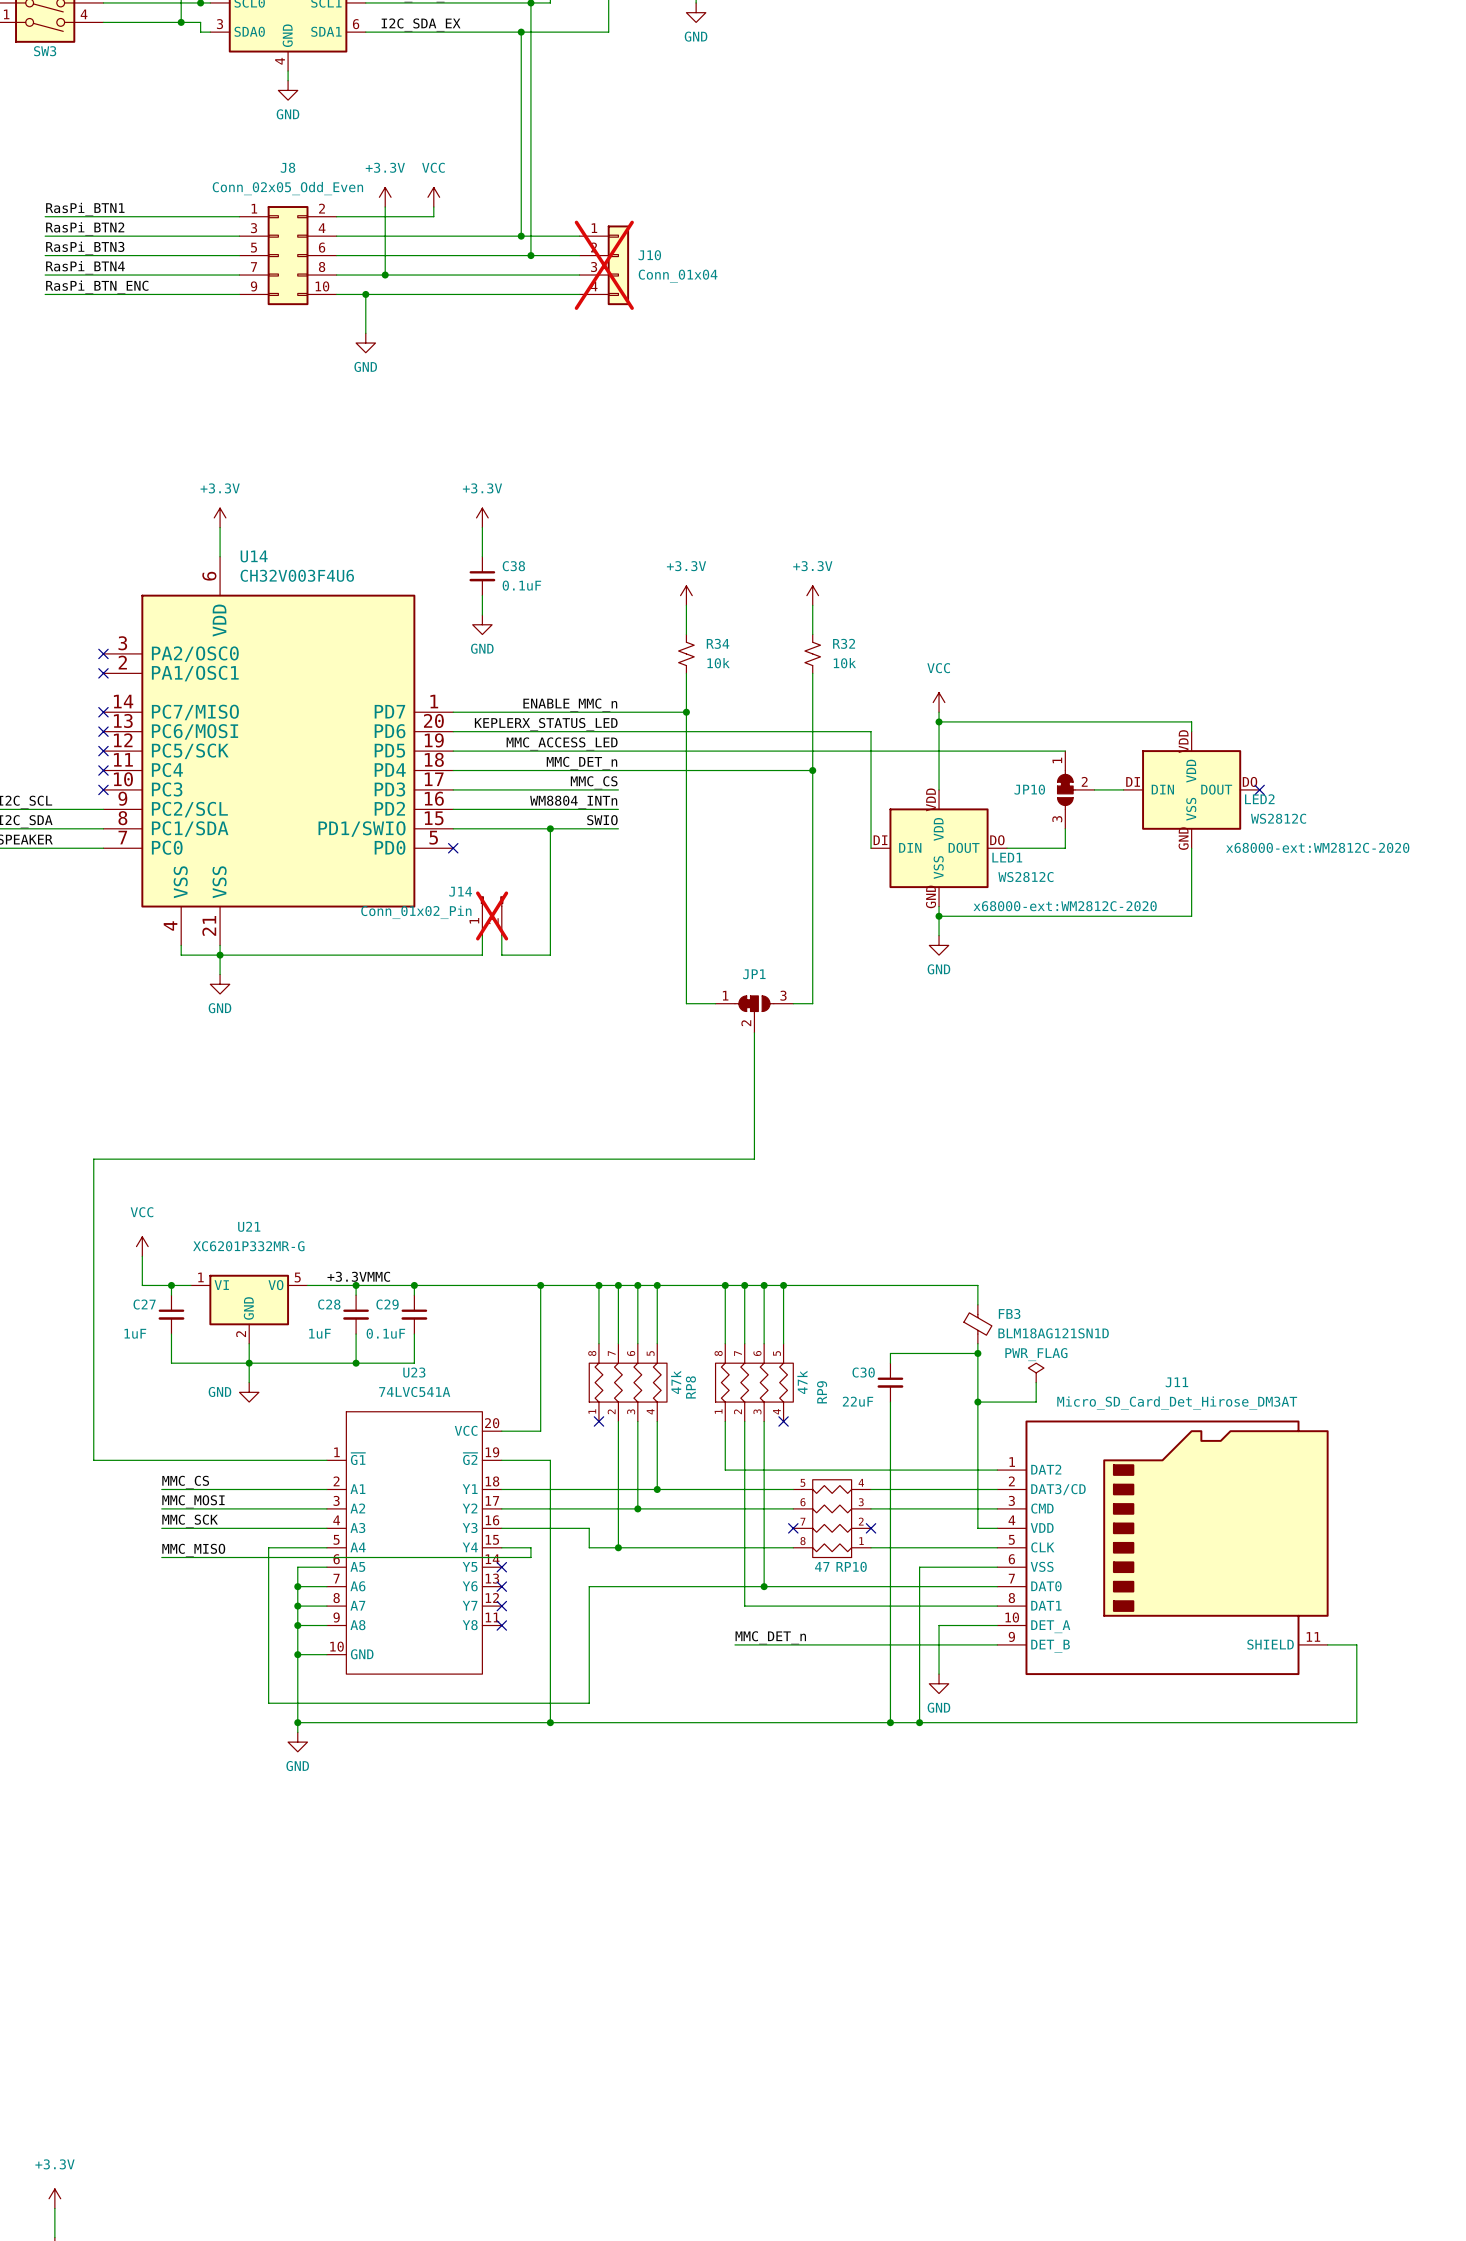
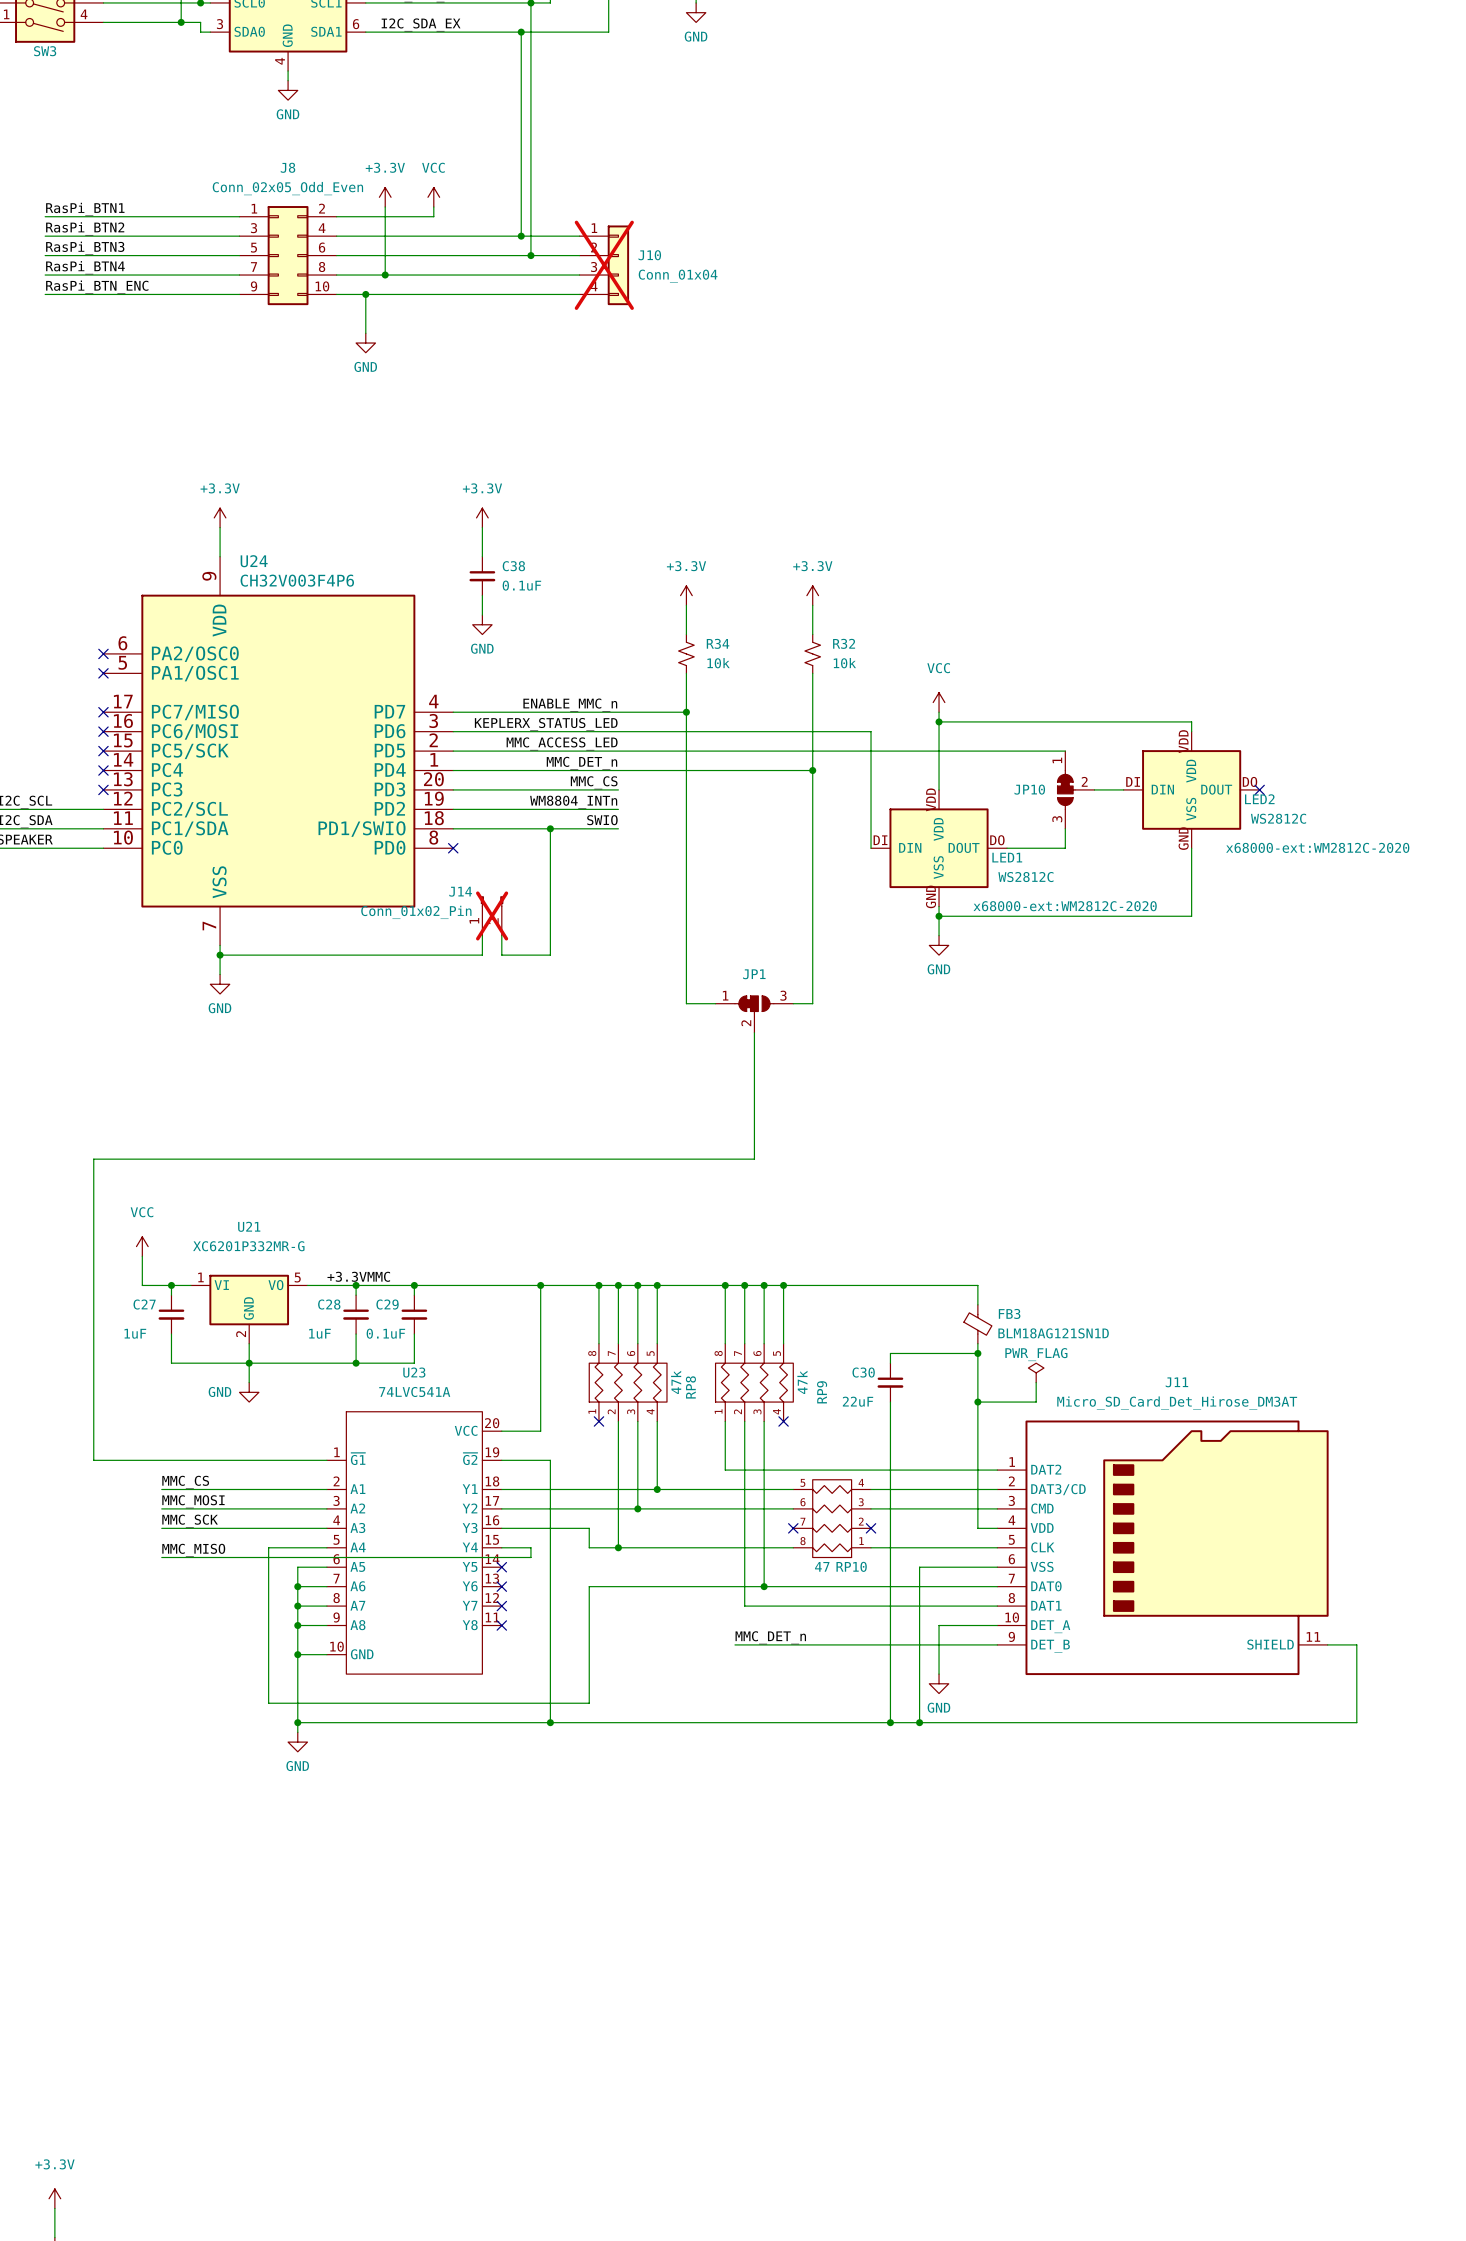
U14: CH32V003F4U6 (278, 751) -> none
U24: none -> CH32V003F4P6 (278, 751)
wire: (181, 945) (181, 955) (220, 955) -> none

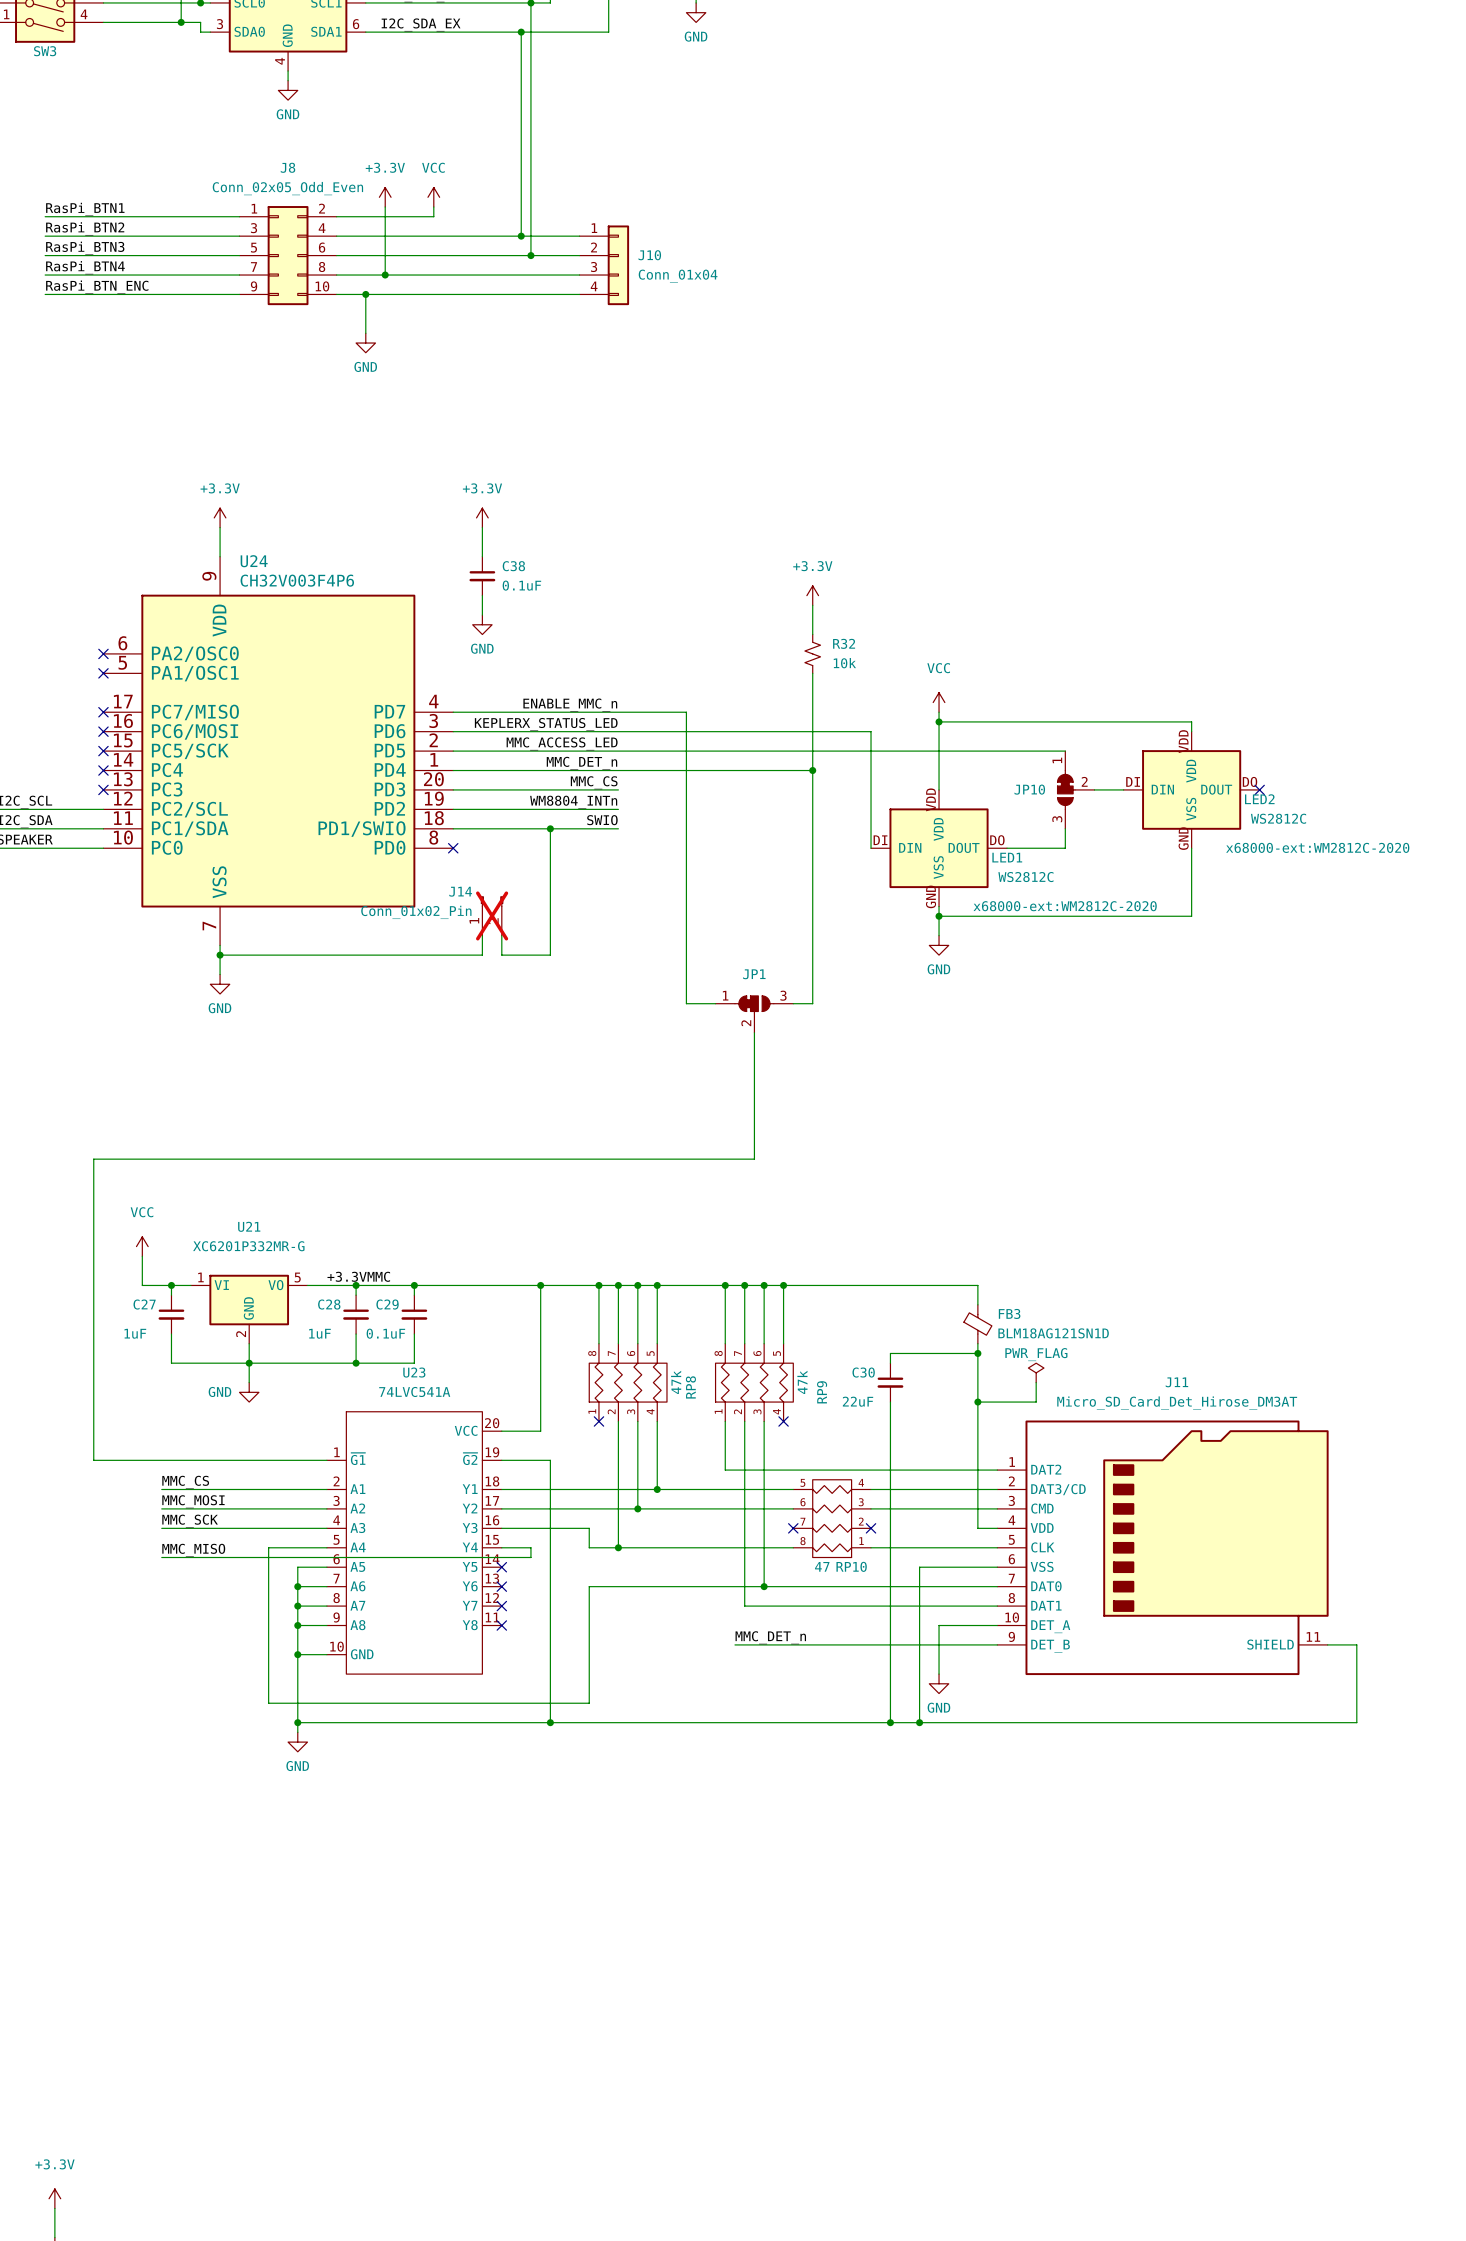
J10 do-not-place cross: (604, 265) -> none
power symbol: +3.3V (686, 595) -> none
wire: (686, 605) (686, 634) -> none
R34: 10k (686, 653) -> none
wire: (686, 673) (686, 712) -> none
junction: (686, 712) -> none

